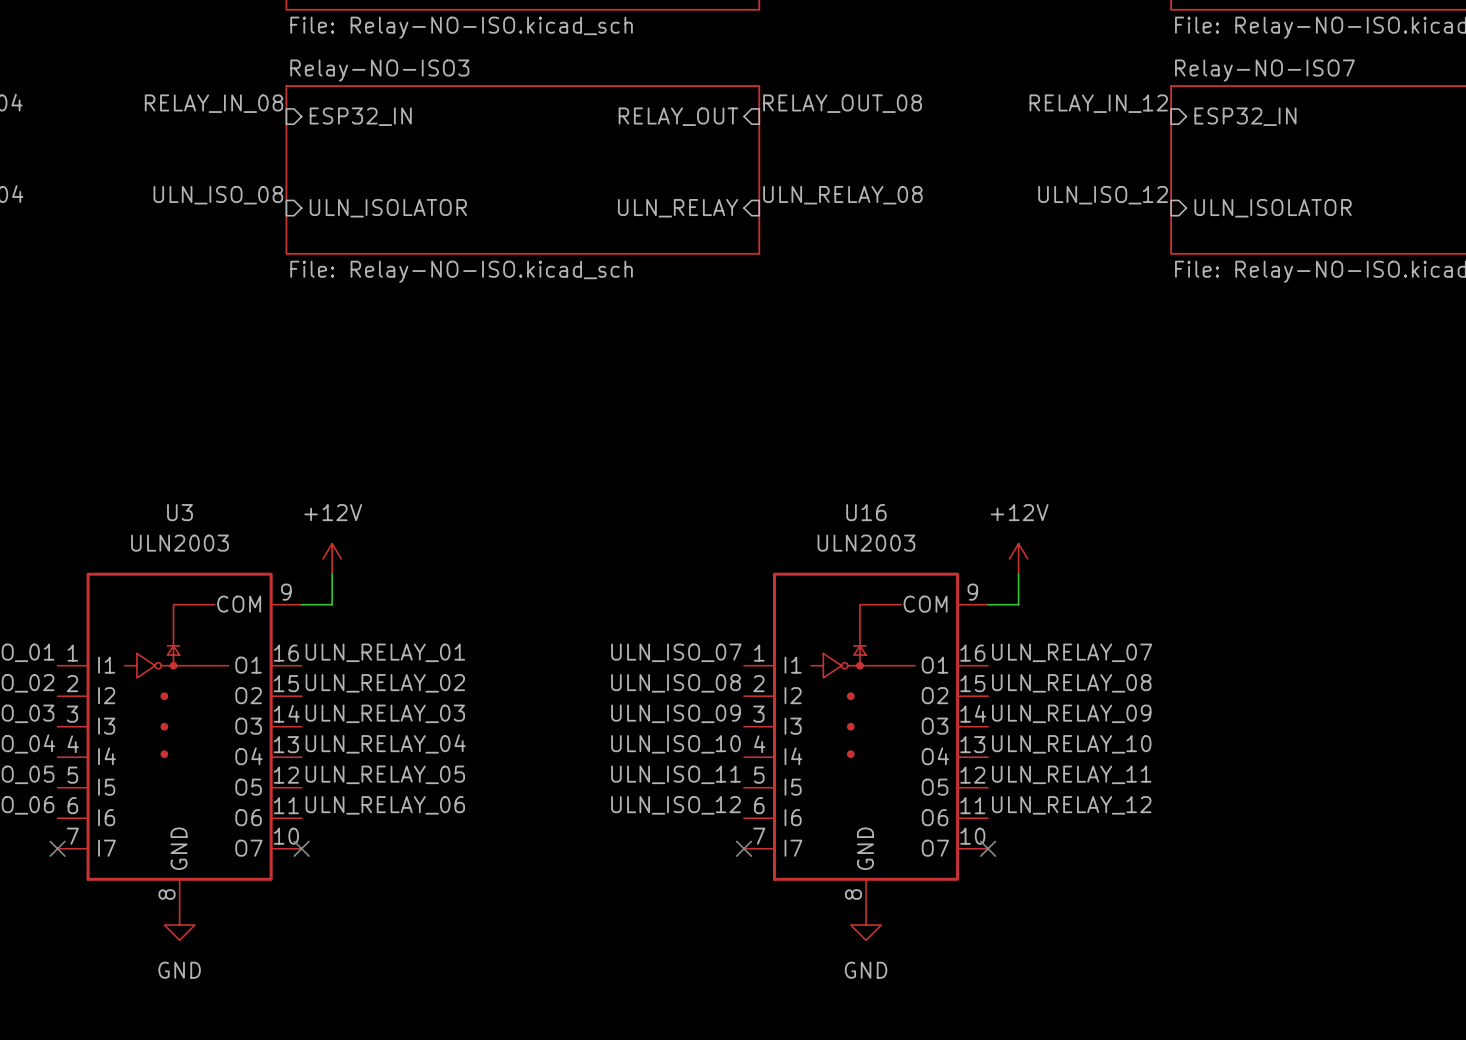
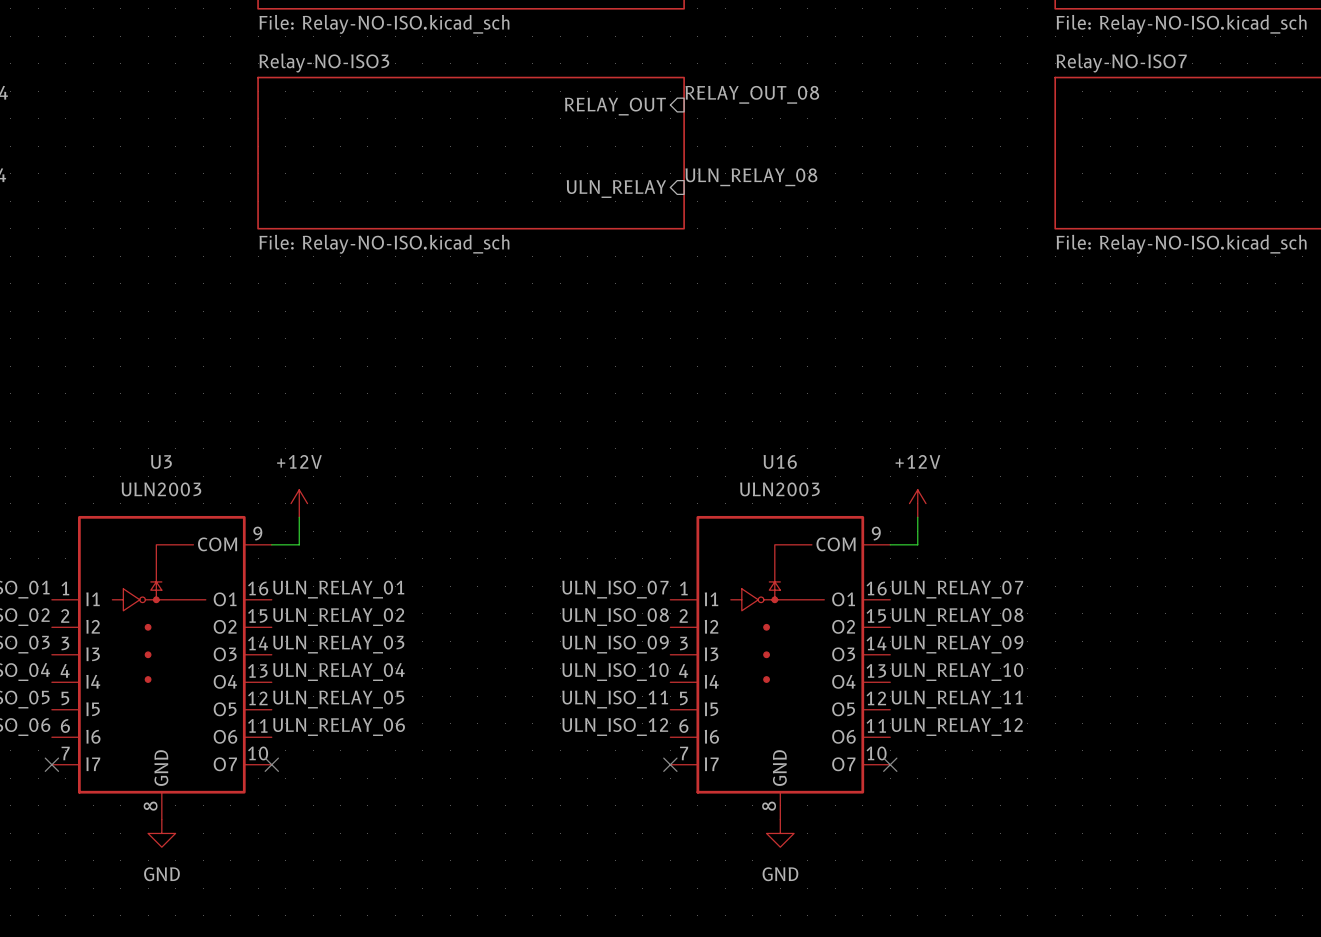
label: RELAY_IN_08 (214, 103) -> none
label: RELAY_IN_12 (1098, 103) -> none
sheet pin: ESP32_IN (360, 116) -> none
sheet pin: ESP32_IN (1245, 116) -> none
label: ULN_ISO_08 (218, 195) -> none
label: ULN_ISO_12 (1103, 195) -> none
sheet pin: ULN_ISOLATOR (388, 208) -> none
sheet pin: ULN_ISOLATOR (1273, 208) -> none

